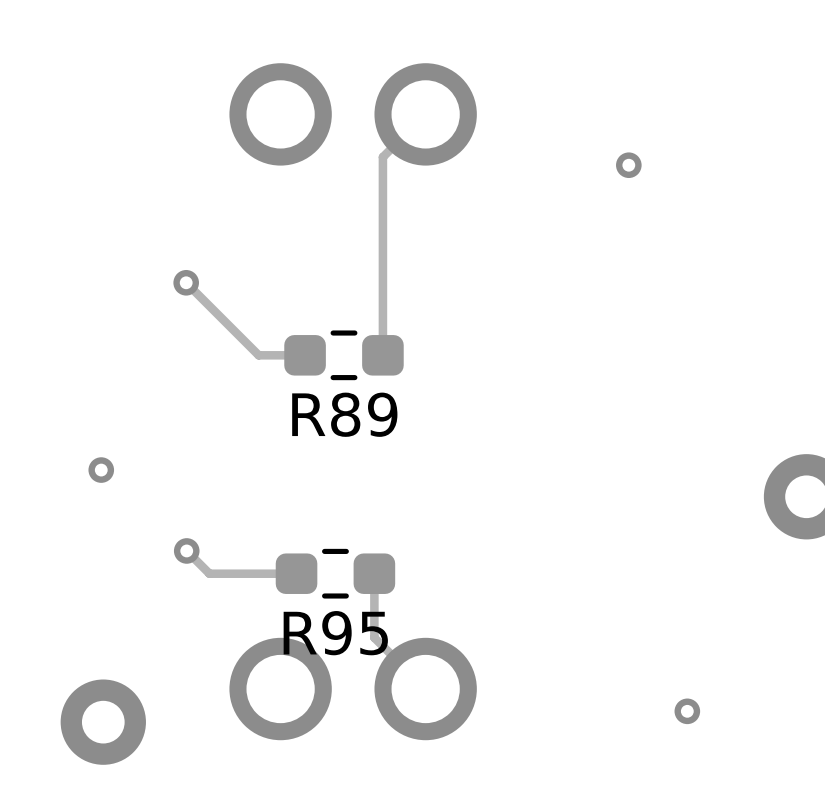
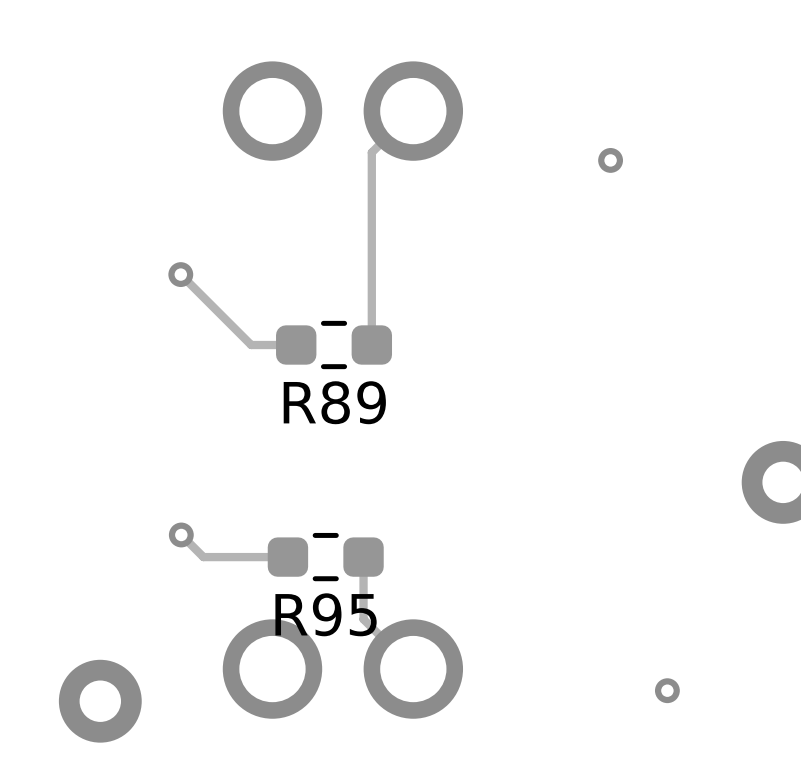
via: (101, 470) -> none

